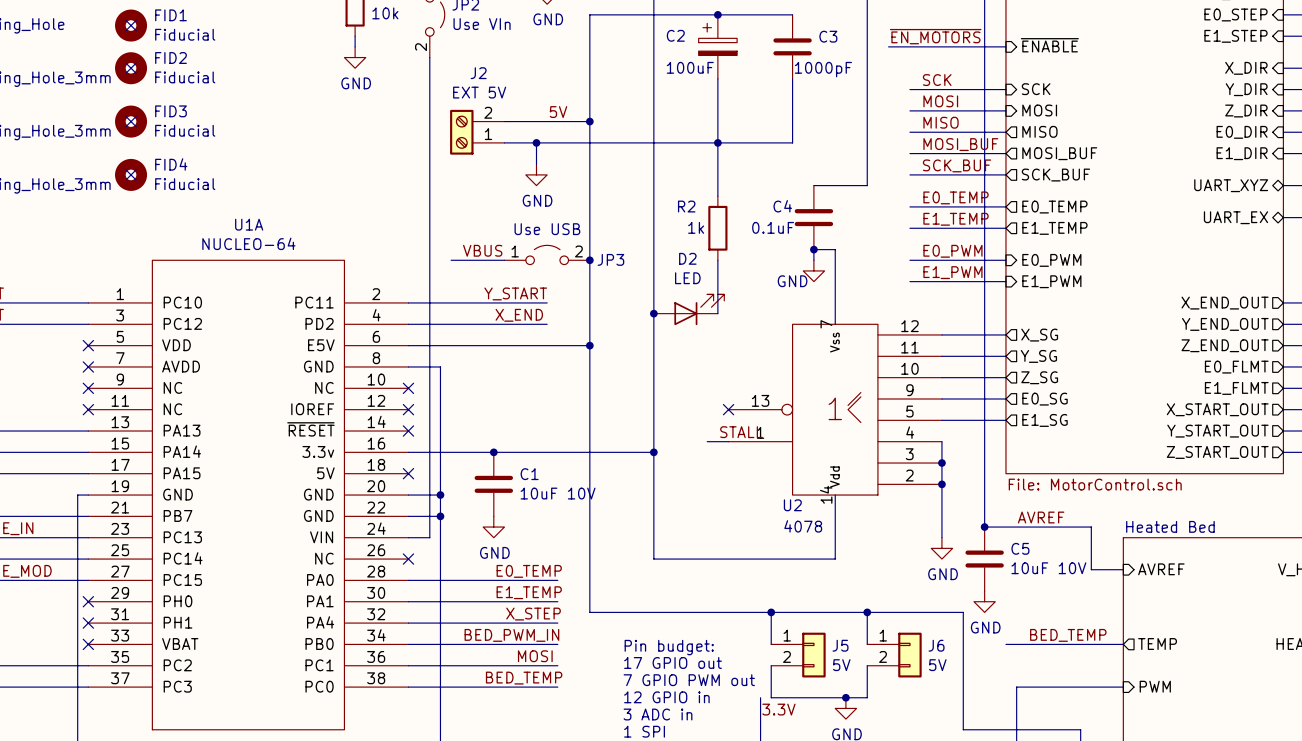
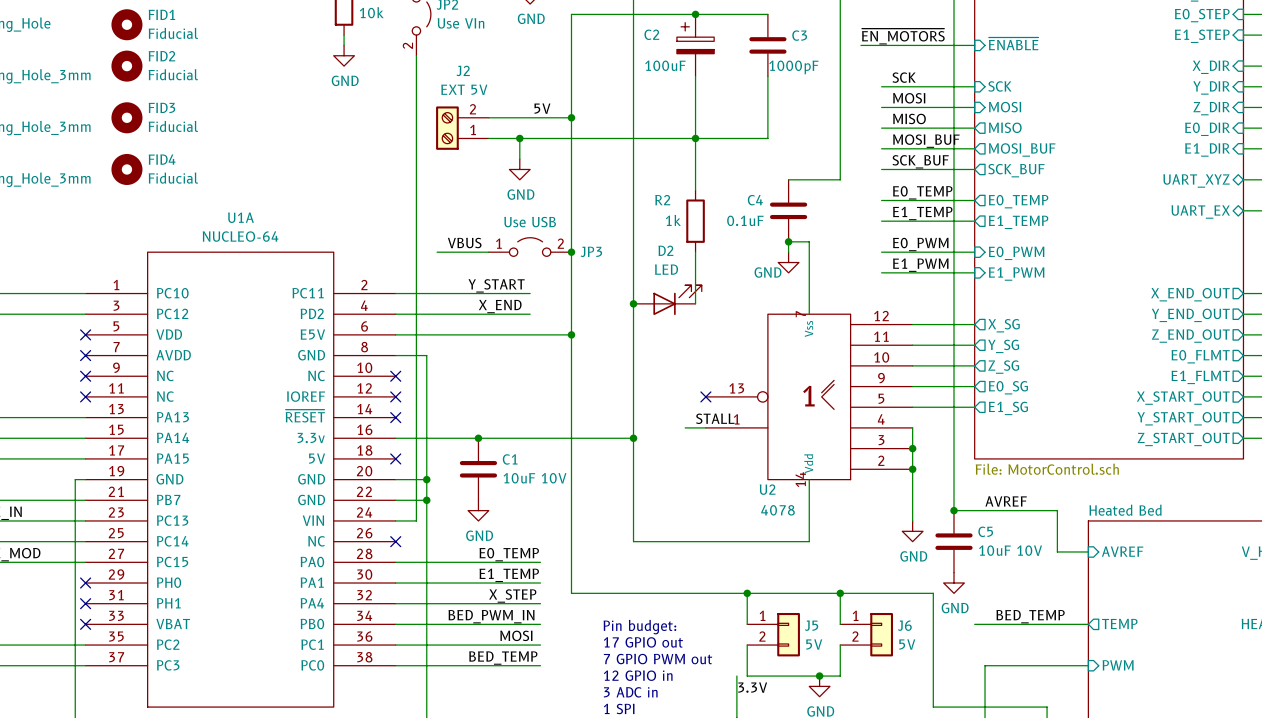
no-connect mark: (131, 25) -> none
no-connect mark: (131, 68) -> none
no-connect mark: (131, 121) -> none
no-connect mark: (131, 174) -> none

